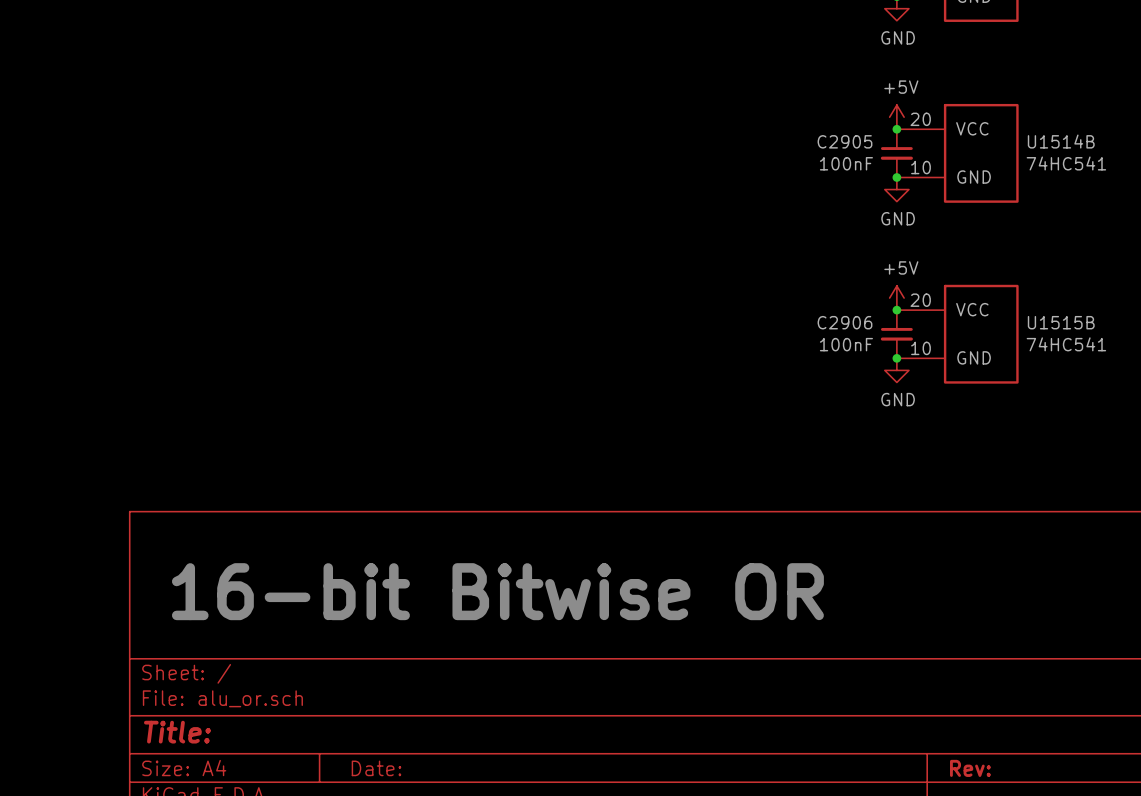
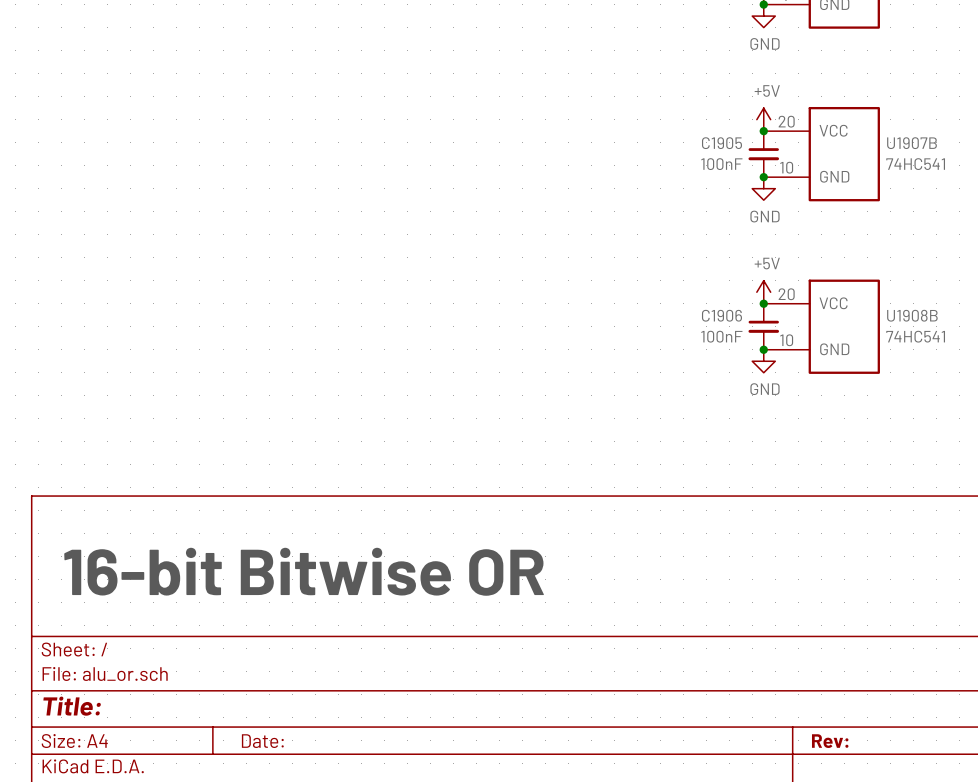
C2905 name: C2905 (844, 141) -> C1905 (721, 143)
U1514B name: U1514B (1061, 141) -> U1907B (912, 143)
C2906 name: C2906 (844, 322) -> C1906 (721, 315)
U1515B name: U1515B (1061, 322) -> U1908B (912, 315)

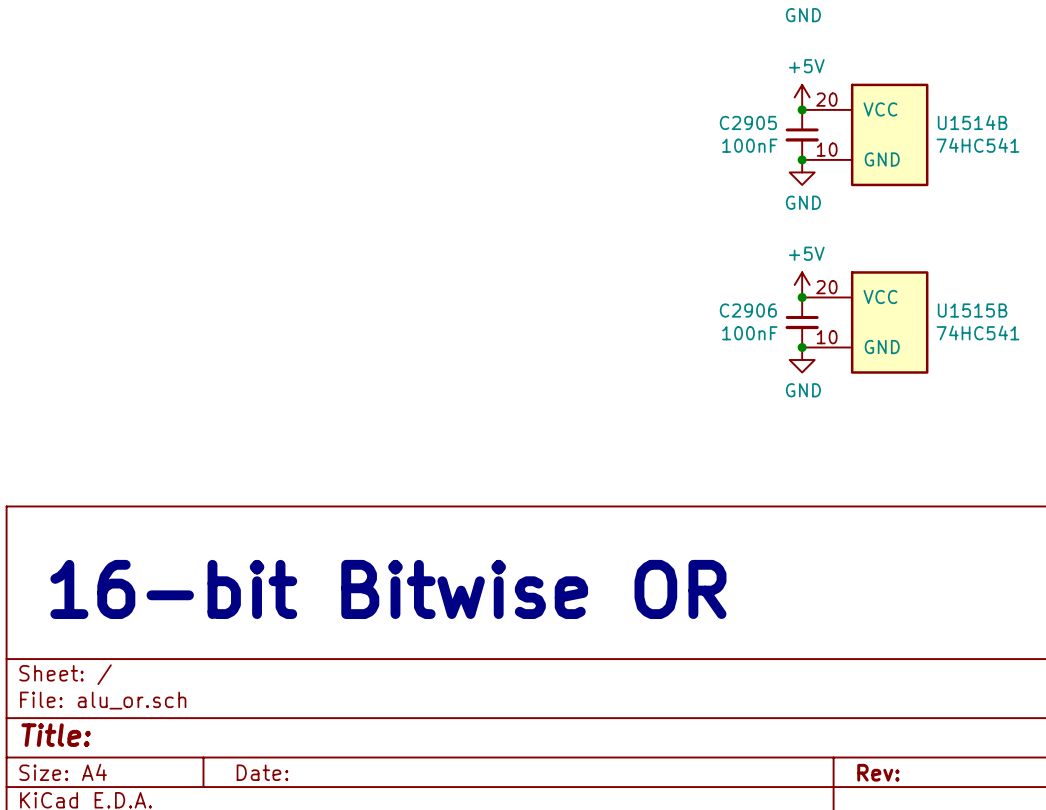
C1905 name: C1905 (721, 143) -> C2905 (748, 122)
U1907B name: U1907B (912, 143) -> U1514B (972, 122)
C1906 name: C1906 (721, 315) -> C2906 (748, 310)
U1908B name: U1908B (912, 315) -> U1515B (972, 310)

